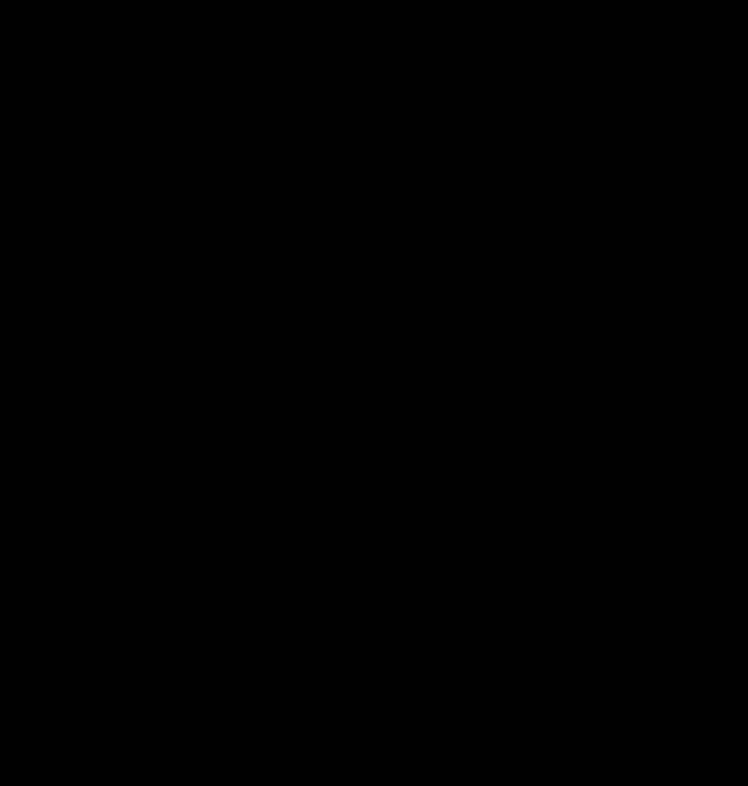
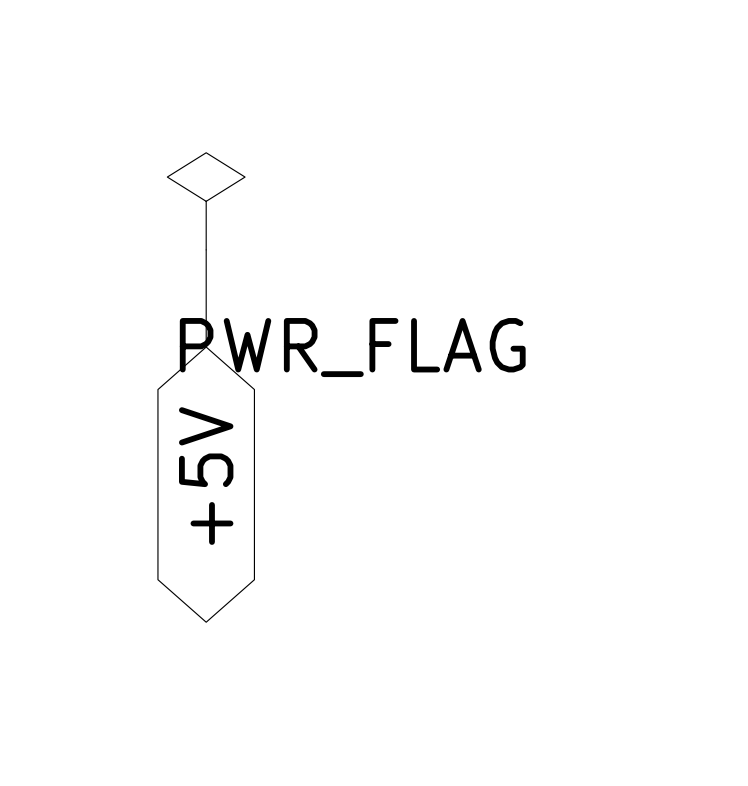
power symbol: none -> PWR_FLAG (206, 201)
wire: none -> (206, 249) (206, 347)
global label: none -> +5V (206, 476)

